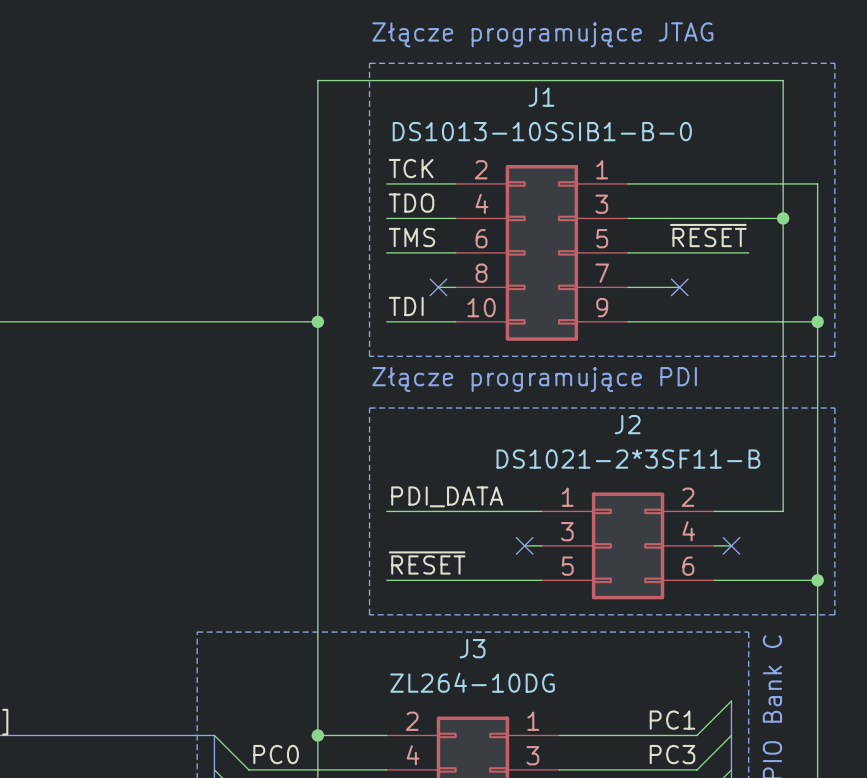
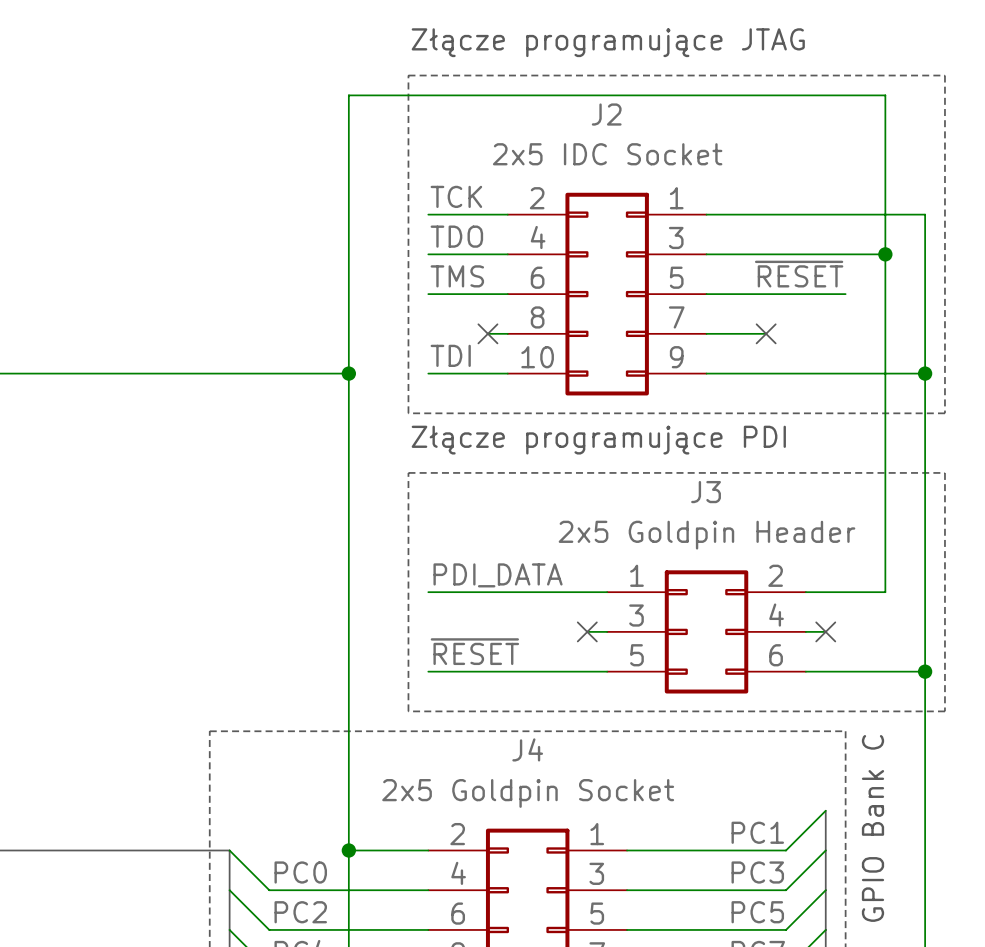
J1 name: J1 (541, 97) -> J2 (606, 114)
J1 value: DS1013-10SSIB1-B-0 (542, 131) -> 2x5 IDC Socket (607, 154)
J2 name: J2 (627, 424) -> J3 (706, 492)
J2 value: DS1021-2*3SF11-B (628, 459) -> 2x5 Goldpin Header (706, 535)
J3 name: J3 (472, 648) -> J4 (527, 749)
J3 value: ZL264-10DG (472, 682) -> 2x5 Goldpin Socket (528, 793)

